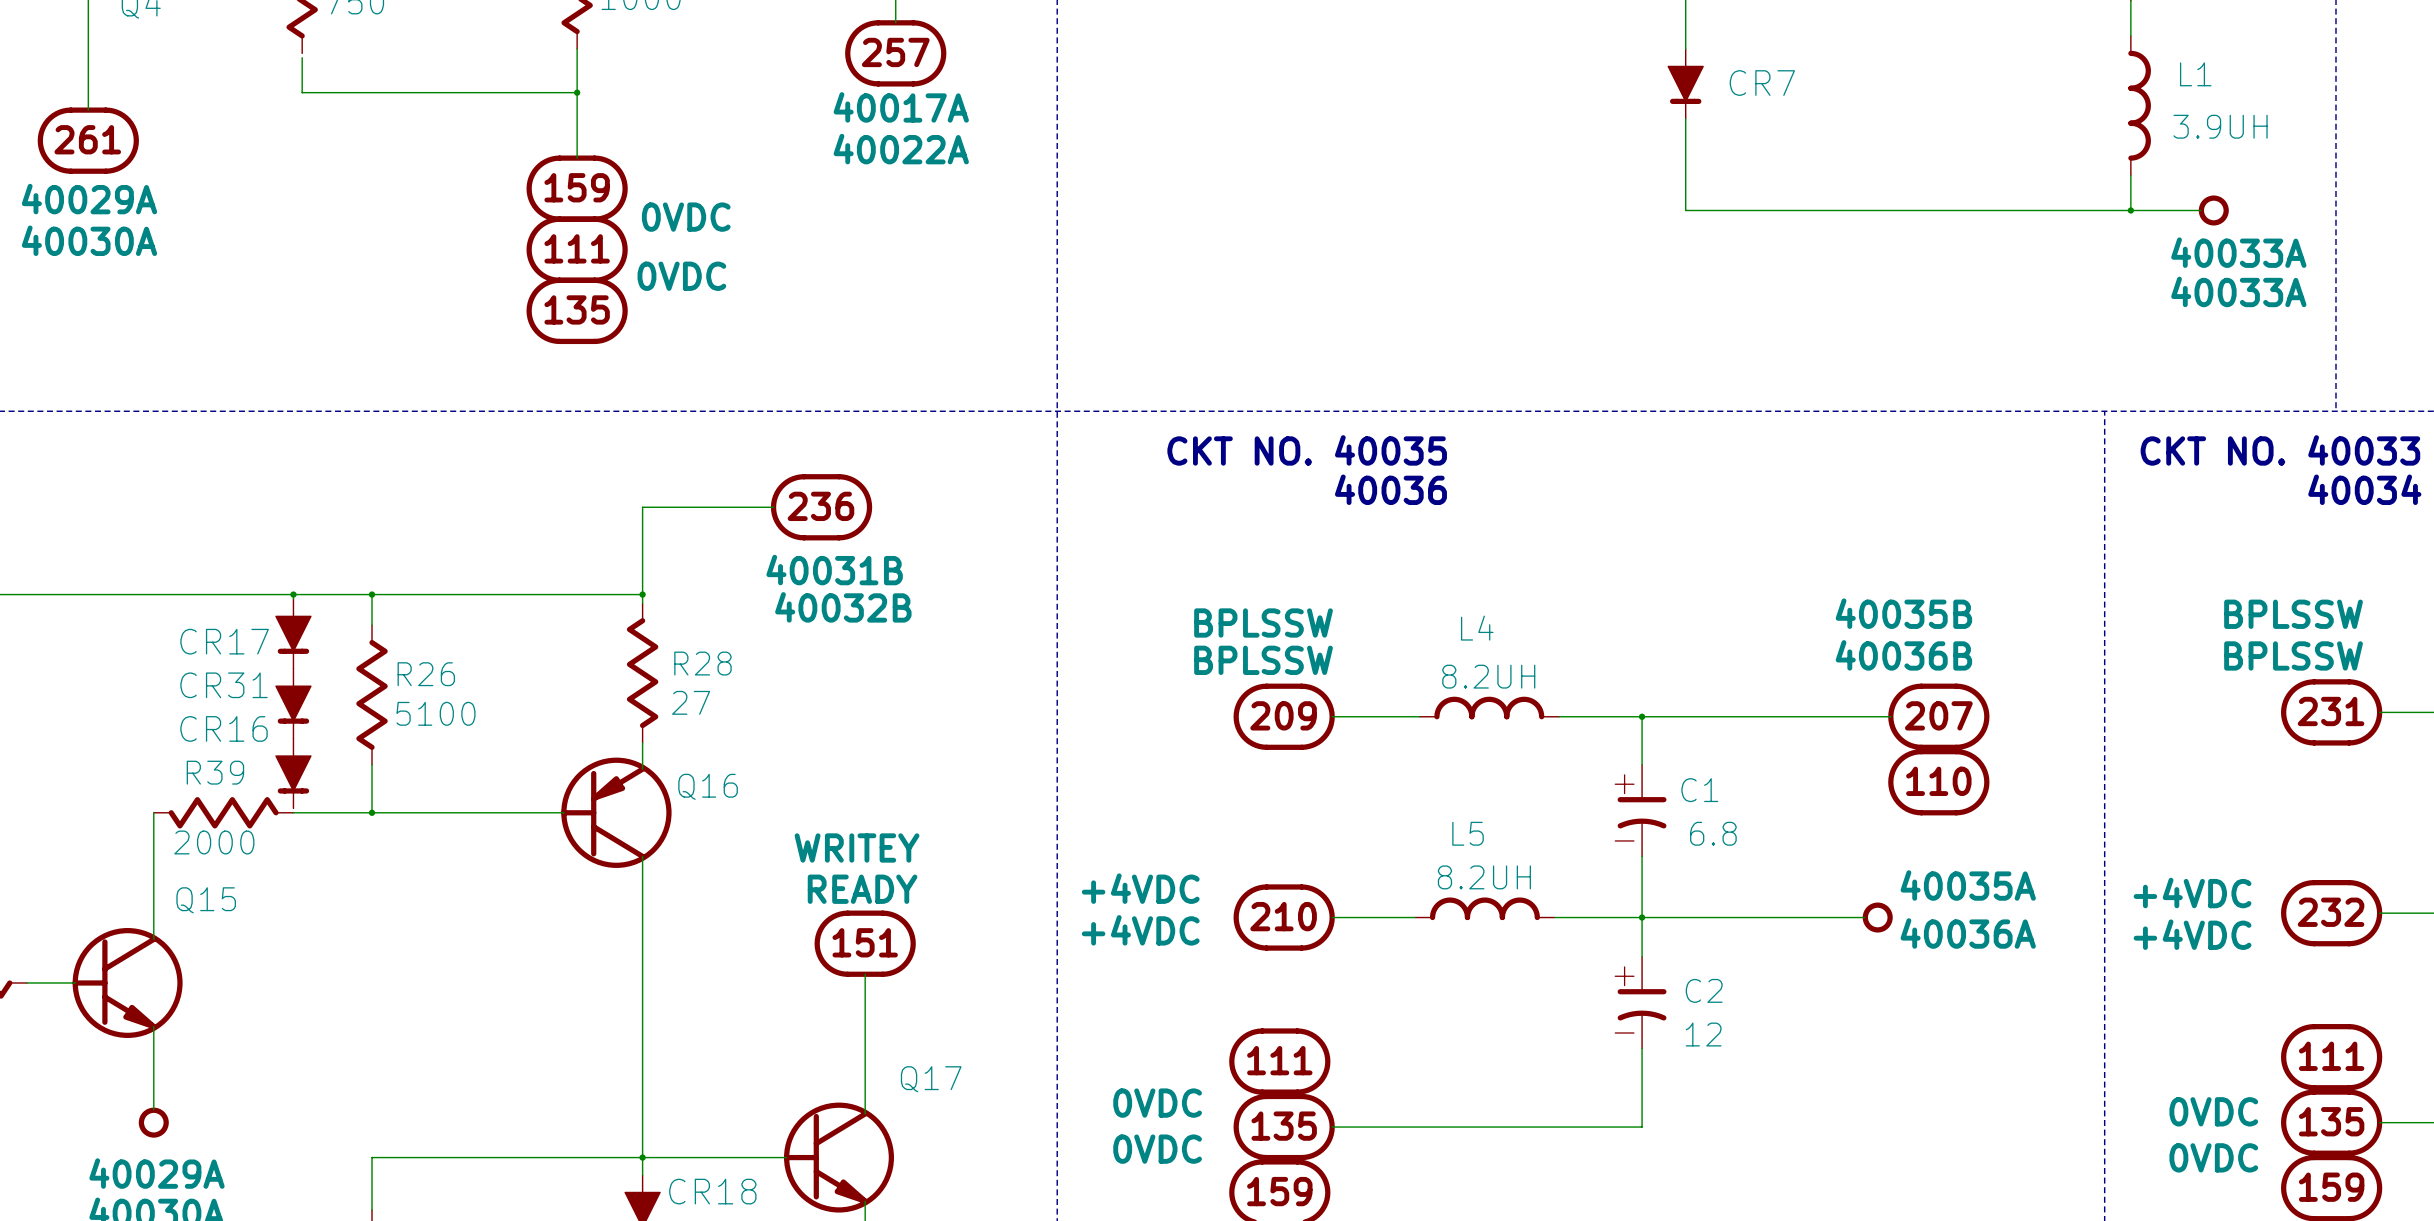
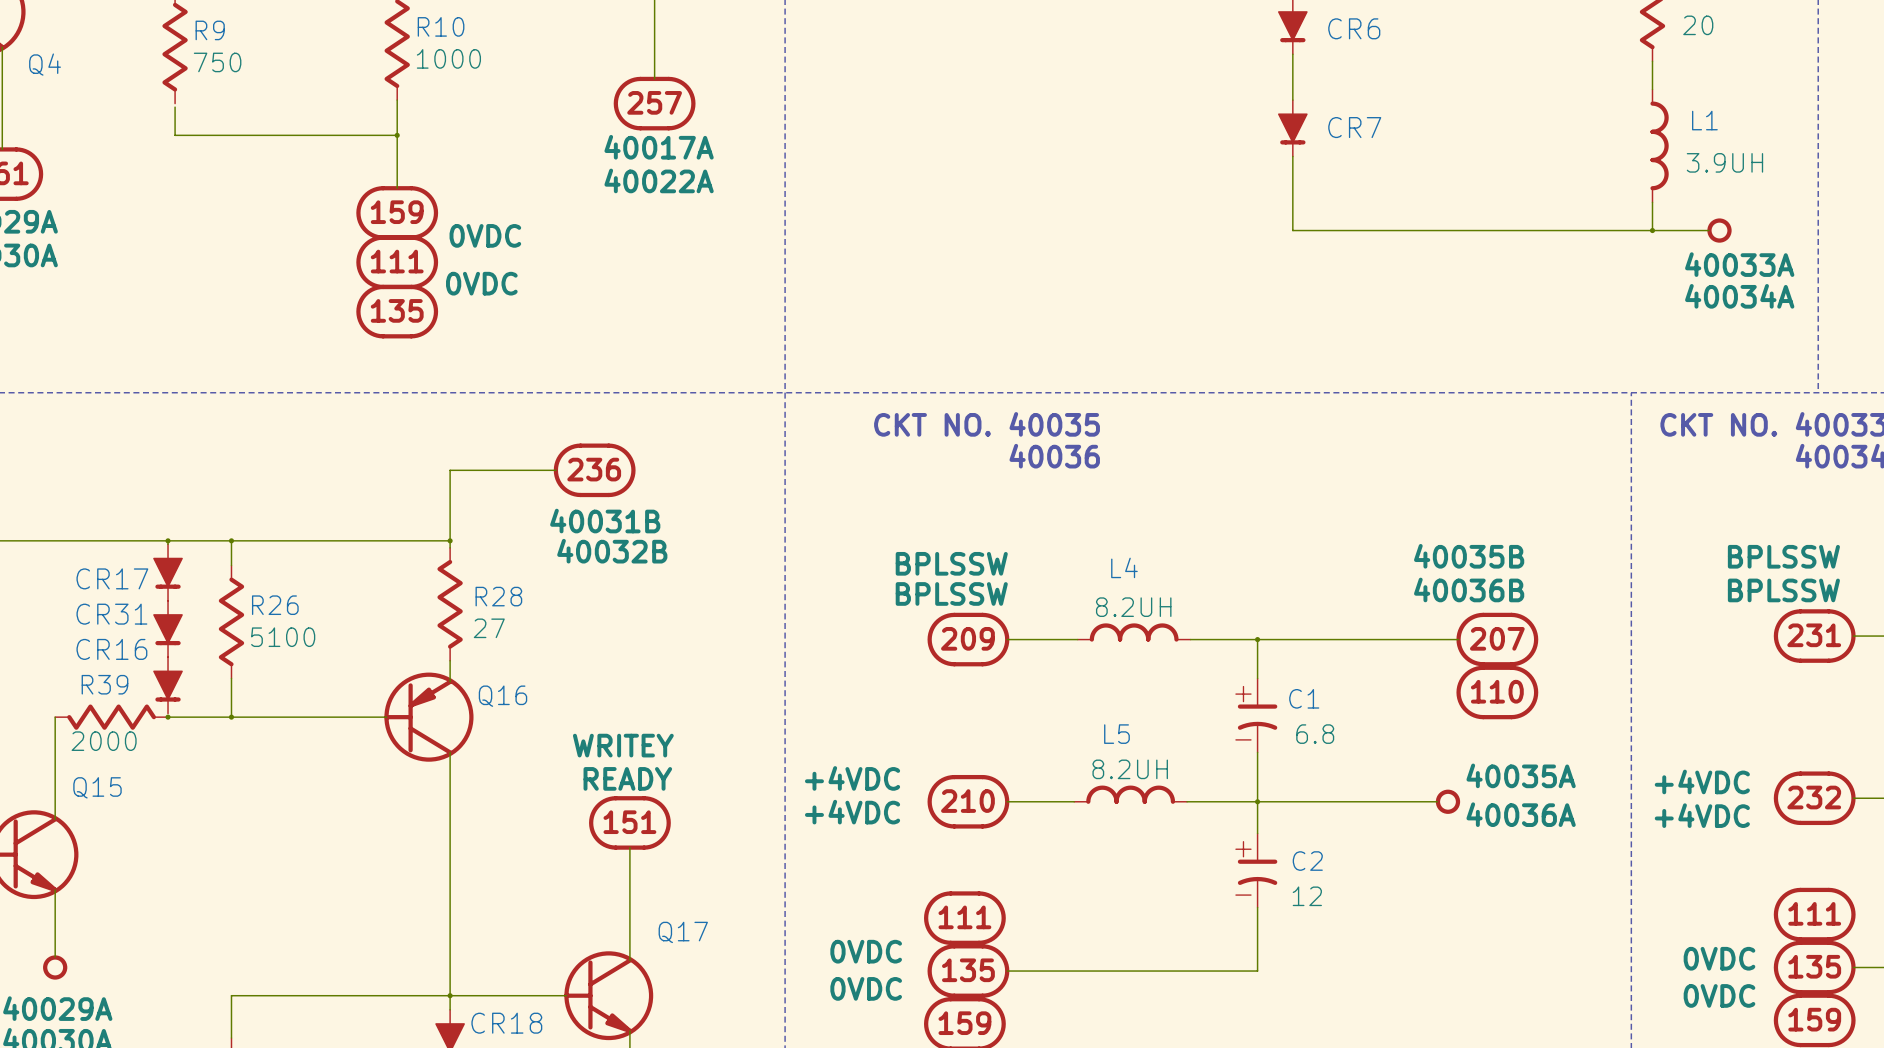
part text: 40033A (2238, 291) -> 40034A (1739, 296)
junction: none -> (168, 717)

